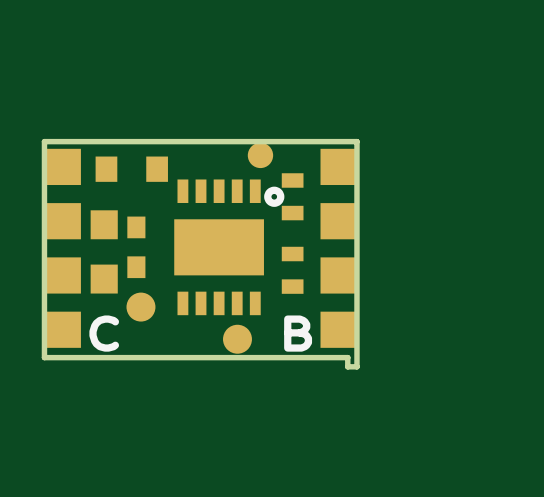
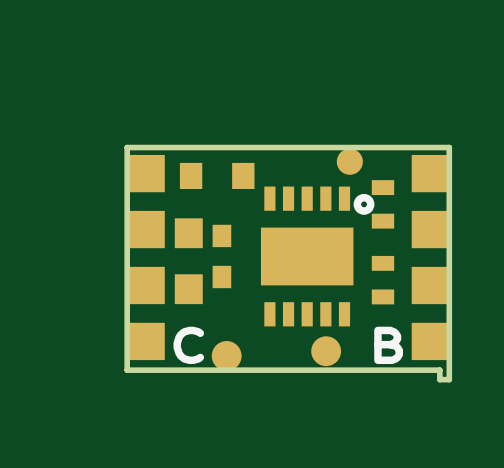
part position: (140, 307) -> (226, 355)

